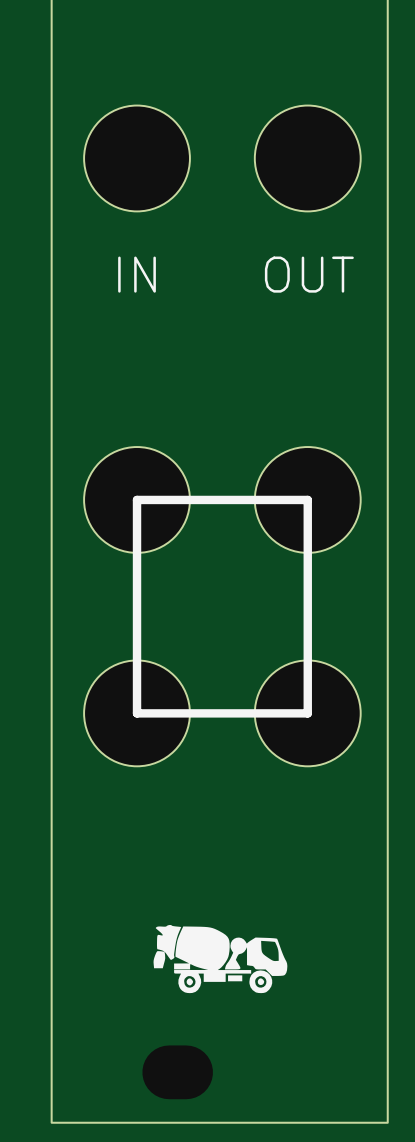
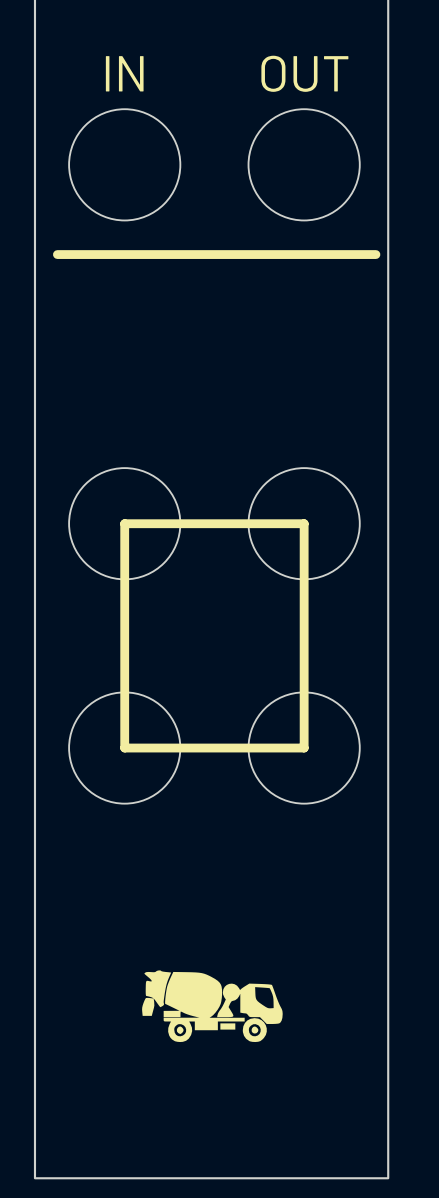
line: none -> (57, 254) (375, 254)
text position: IN (137, 274) -> IN (124, 73)
text position: OUT (309, 274) -> OUT (304, 73)

